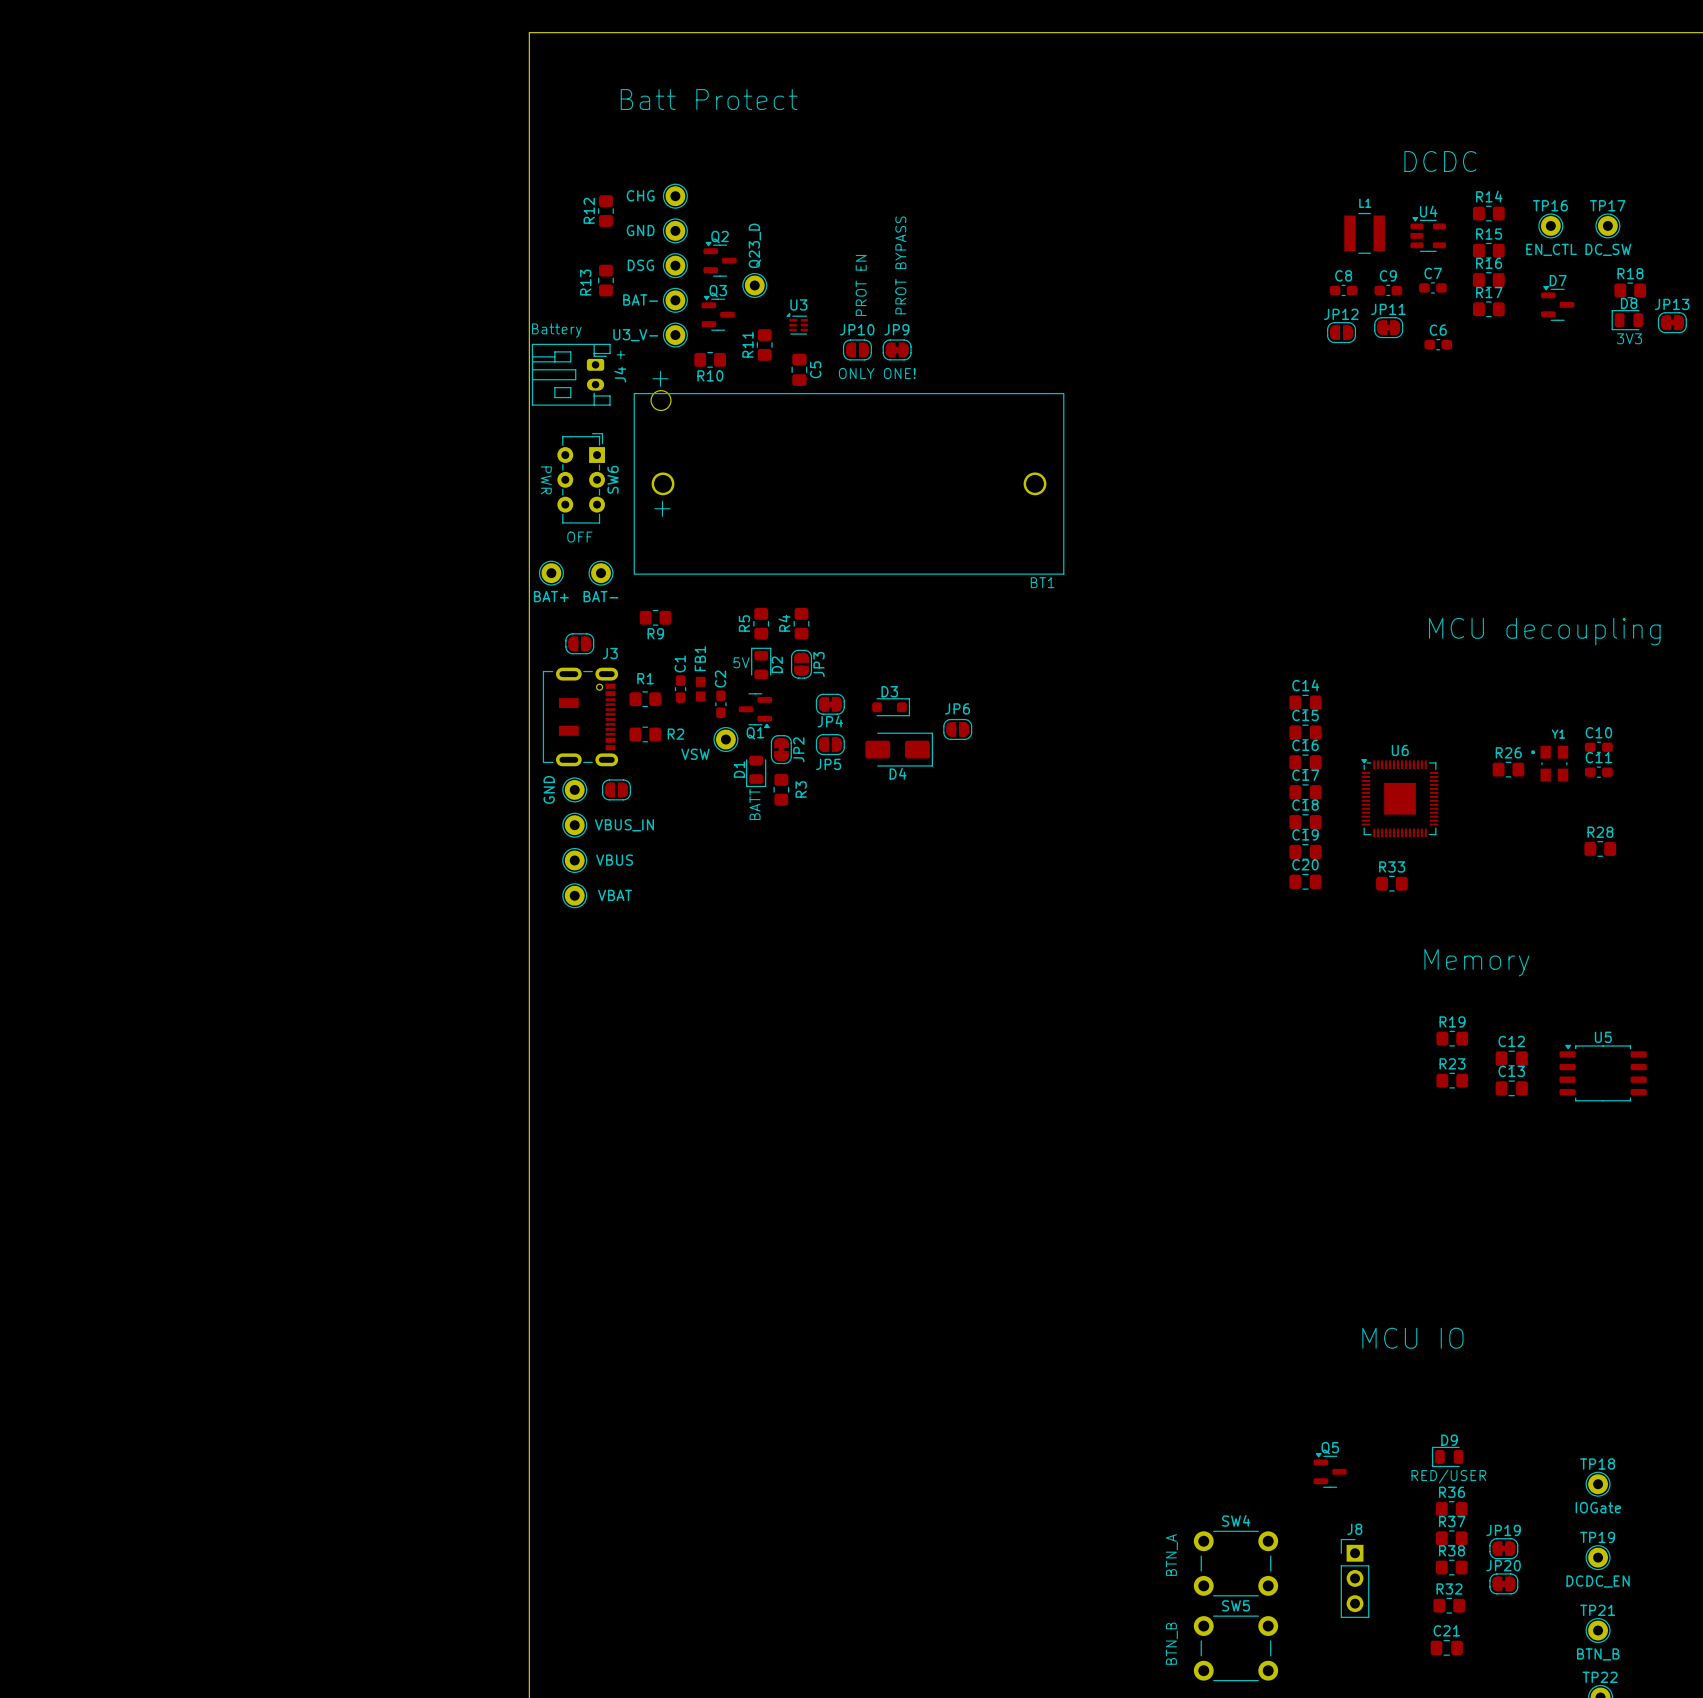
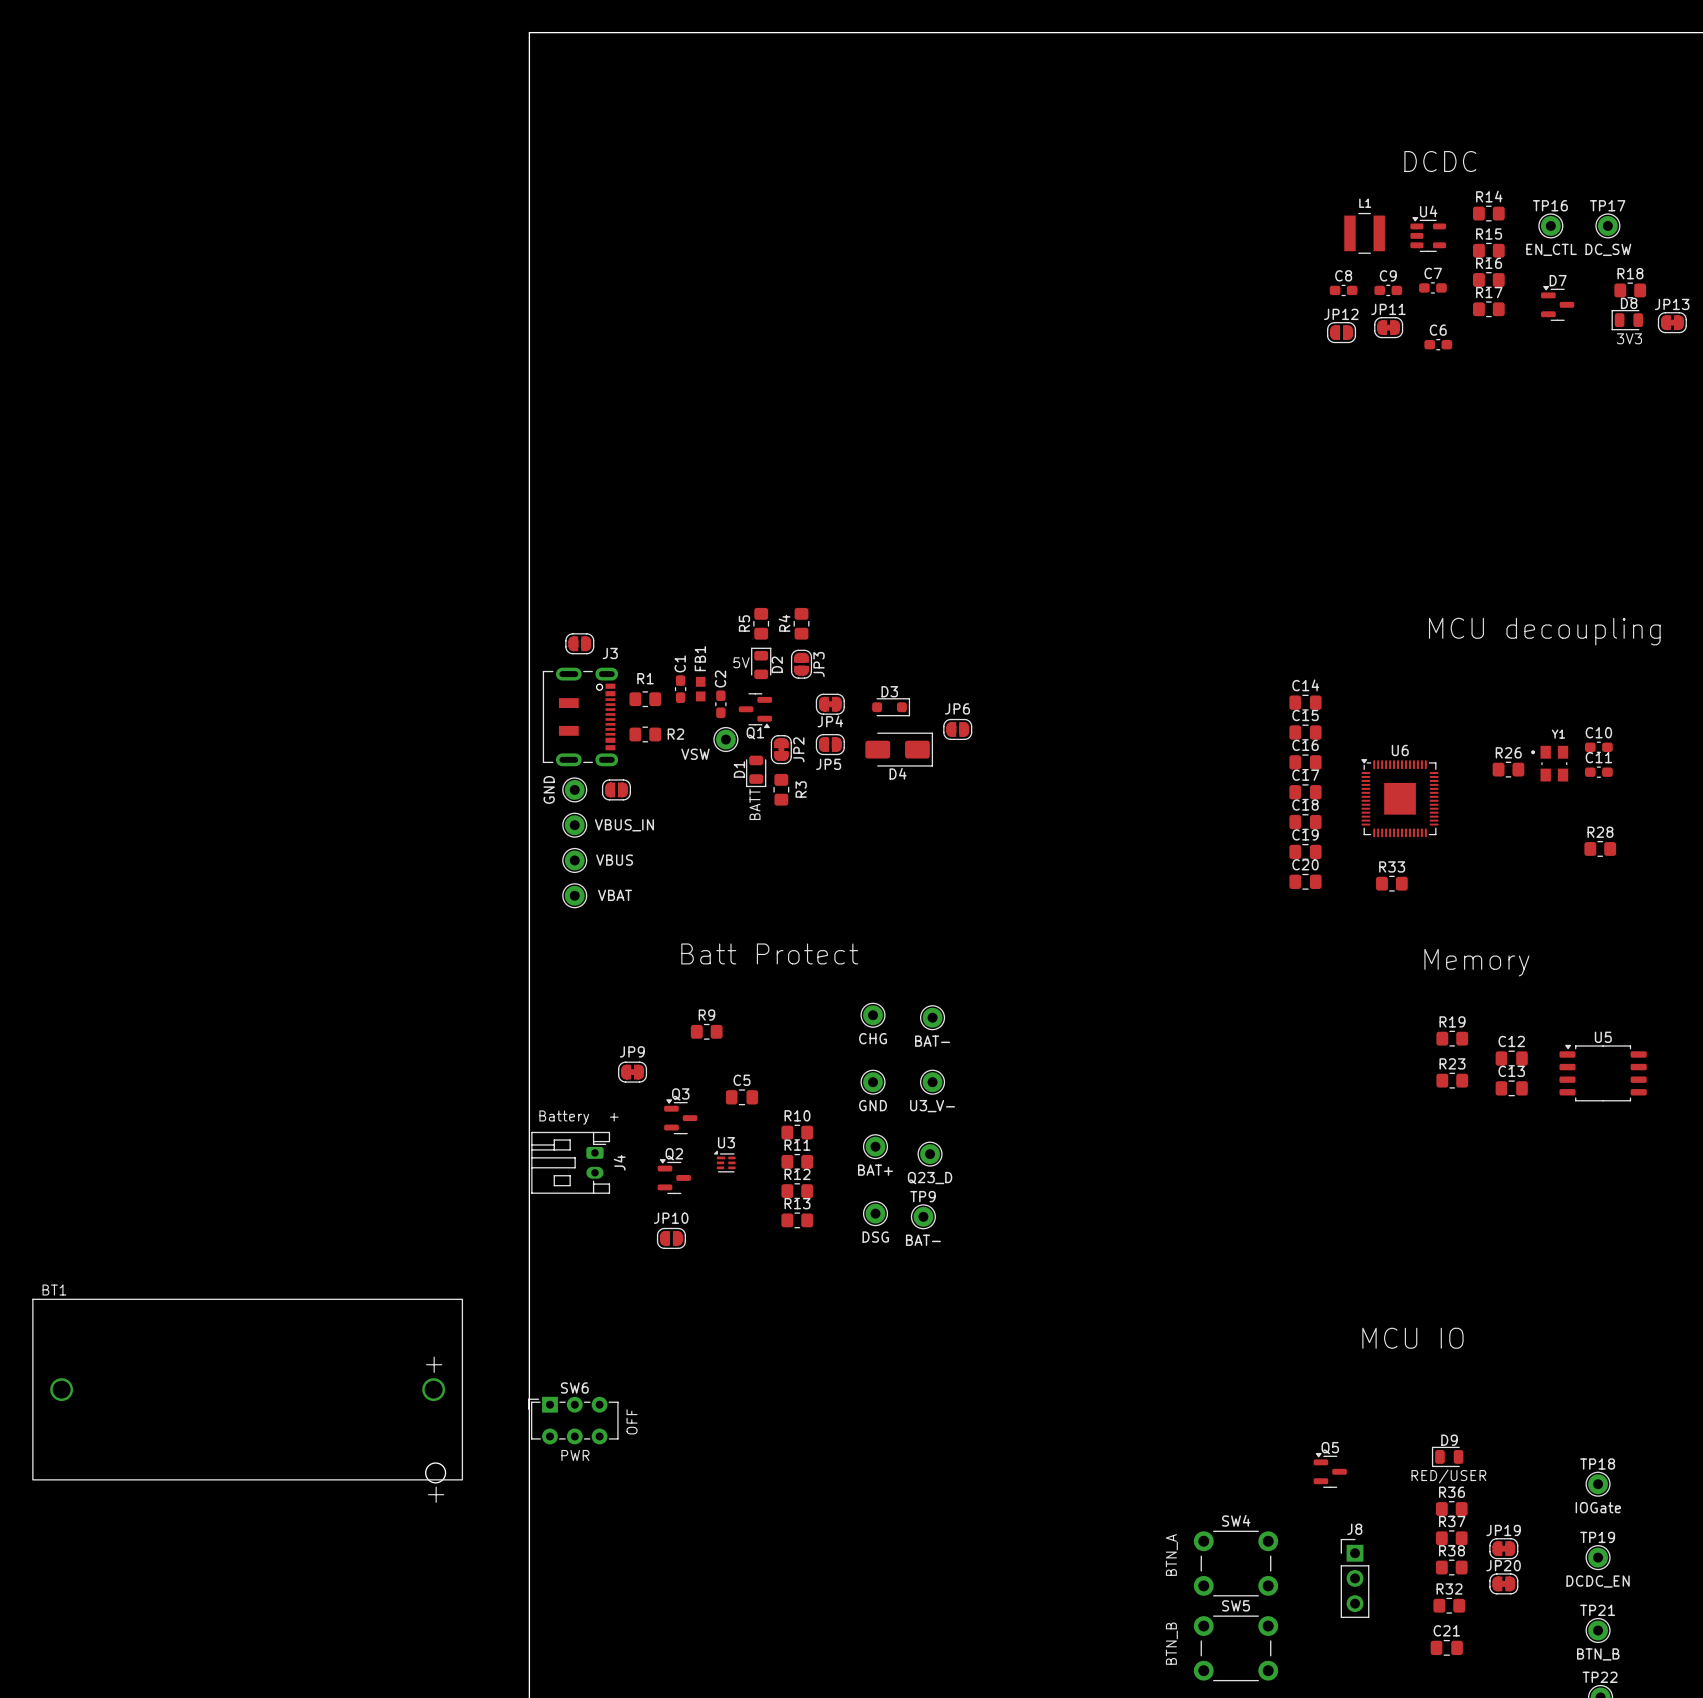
text: Batt Protect (709, 99) -> none
part: (675, 196) -> none
R12 rotation: 0° (605, 211) -> 90° clockwise (797, 1191)
R12 position: (605, 211) -> (797, 1191)
part: (675, 230) -> none
Q2 position: (720, 259) -> (674, 1176)
part: (675, 265) -> none
text: PROT BYPASS (900, 265) -> none
R13 rotation: 0° (605, 280) -> 90° clockwise (797, 1220)
R13 position: (605, 280) -> (797, 1220)
part: (754, 285) -> none
text: PROT EN (861, 285) -> none
part: (675, 300) -> none
Q3 position: (718, 313) -> (680, 1116)
U3 position: (797, 323) -> (724, 1161)
text: Battery (556, 330) -> none
part: (675, 335) -> none
R11 rotation: 0° (764, 344) -> 90° clockwise (797, 1161)
R11 position: (764, 344) -> (797, 1161)
JP10 position: (857, 349) -> (671, 1238)
JP9 position: (897, 349) -> (632, 1072)
text: + (620, 354) -> none
R10 position: (710, 359) -> (797, 1132)
C5 rotation: 0° (799, 369) -> 90° clockwise (742, 1097)
C5 position: (799, 369) -> (742, 1097)
C5 name position: C5 (815, 369) -> C5 (742, 1080)
text: ONLY ONE! (877, 373) -> none
J4 position: (571, 374) -> (570, 1162)
R10 name position: R10 (710, 375) -> R10 (797, 1115)
SW6 rotation: 0° (581, 478) -> 90° counterclockwise (573, 1420)
SW6 position: (581, 478) -> (573, 1420)
text: PWR (546, 480) -> none
BT1 rotation: 0° (849, 482) -> 180° (247, 1390)
BT1 position: (849, 482) -> (247, 1390)
text: OFF (579, 537) -> none
part: (551, 573) -> none
part: (601, 573) -> none
R9 position: (655, 617) -> (706, 1031)
R9 name position: R9 (655, 633) -> R9 (706, 1015)
text: none -> Batt Protect (769, 953)
part: none -> (873, 1015)
part: none -> (932, 1017)
part: none -> (873, 1082)
part: none -> (932, 1082)
text: none -> Battery (564, 1117)
text: none -> + (614, 1117)
part: none -> (875, 1146)
part: none -> (930, 1154)
part: none -> (875, 1213)
TP9: none -> (923, 1216)
text: none -> OFF (632, 1421)
text: none -> PWR (575, 1455)

